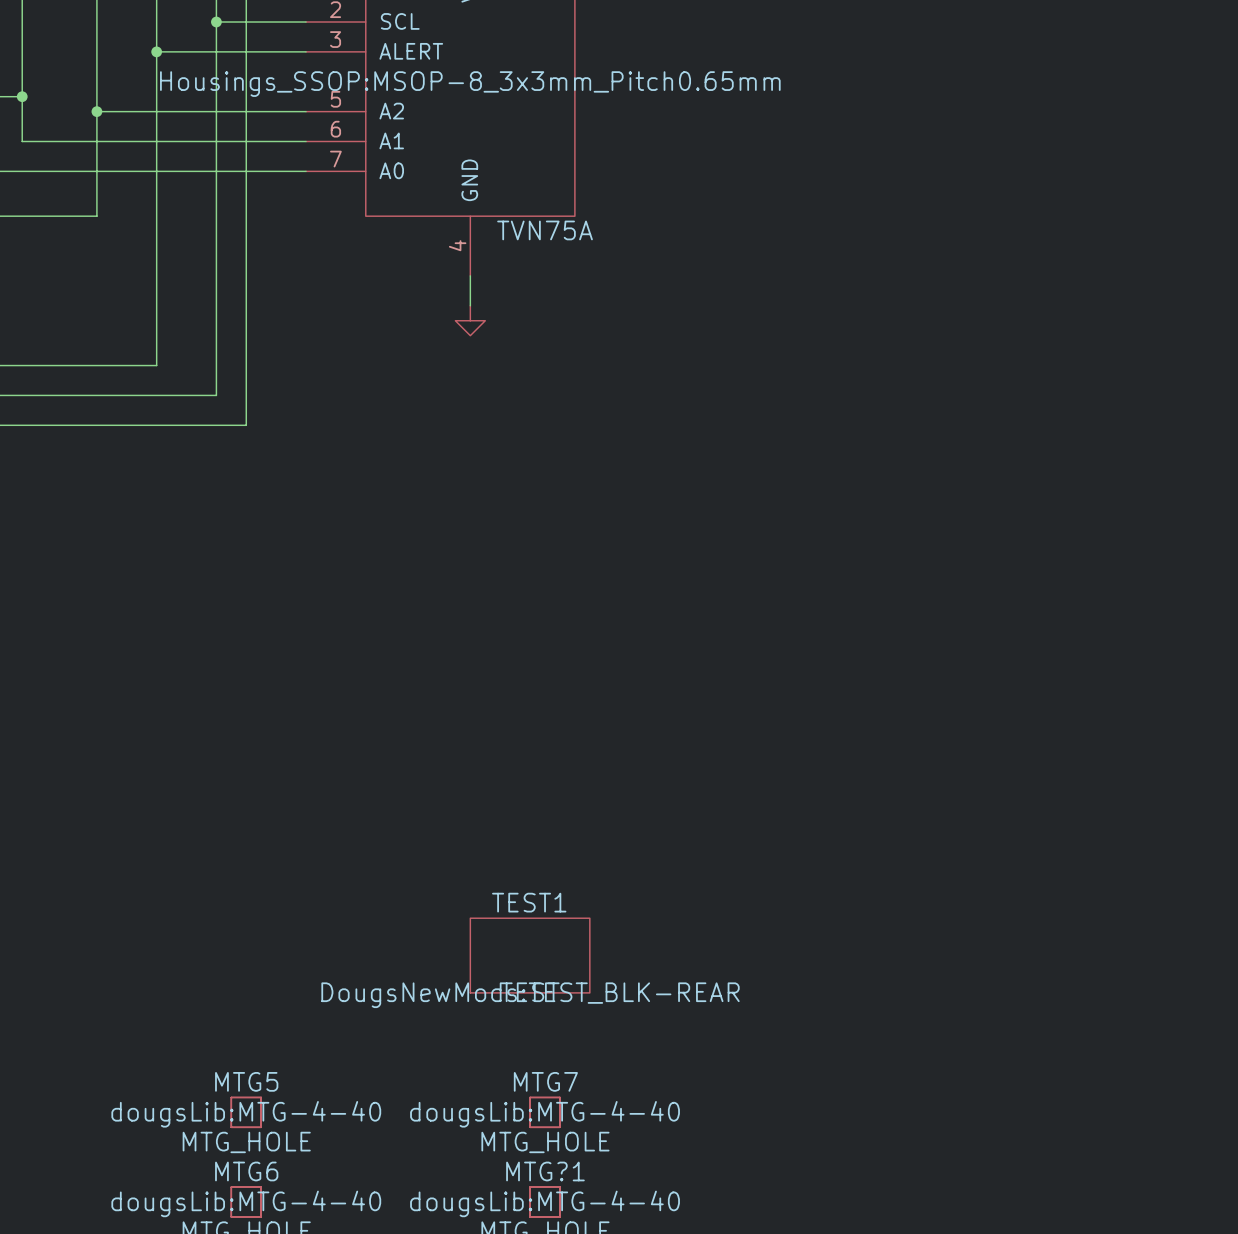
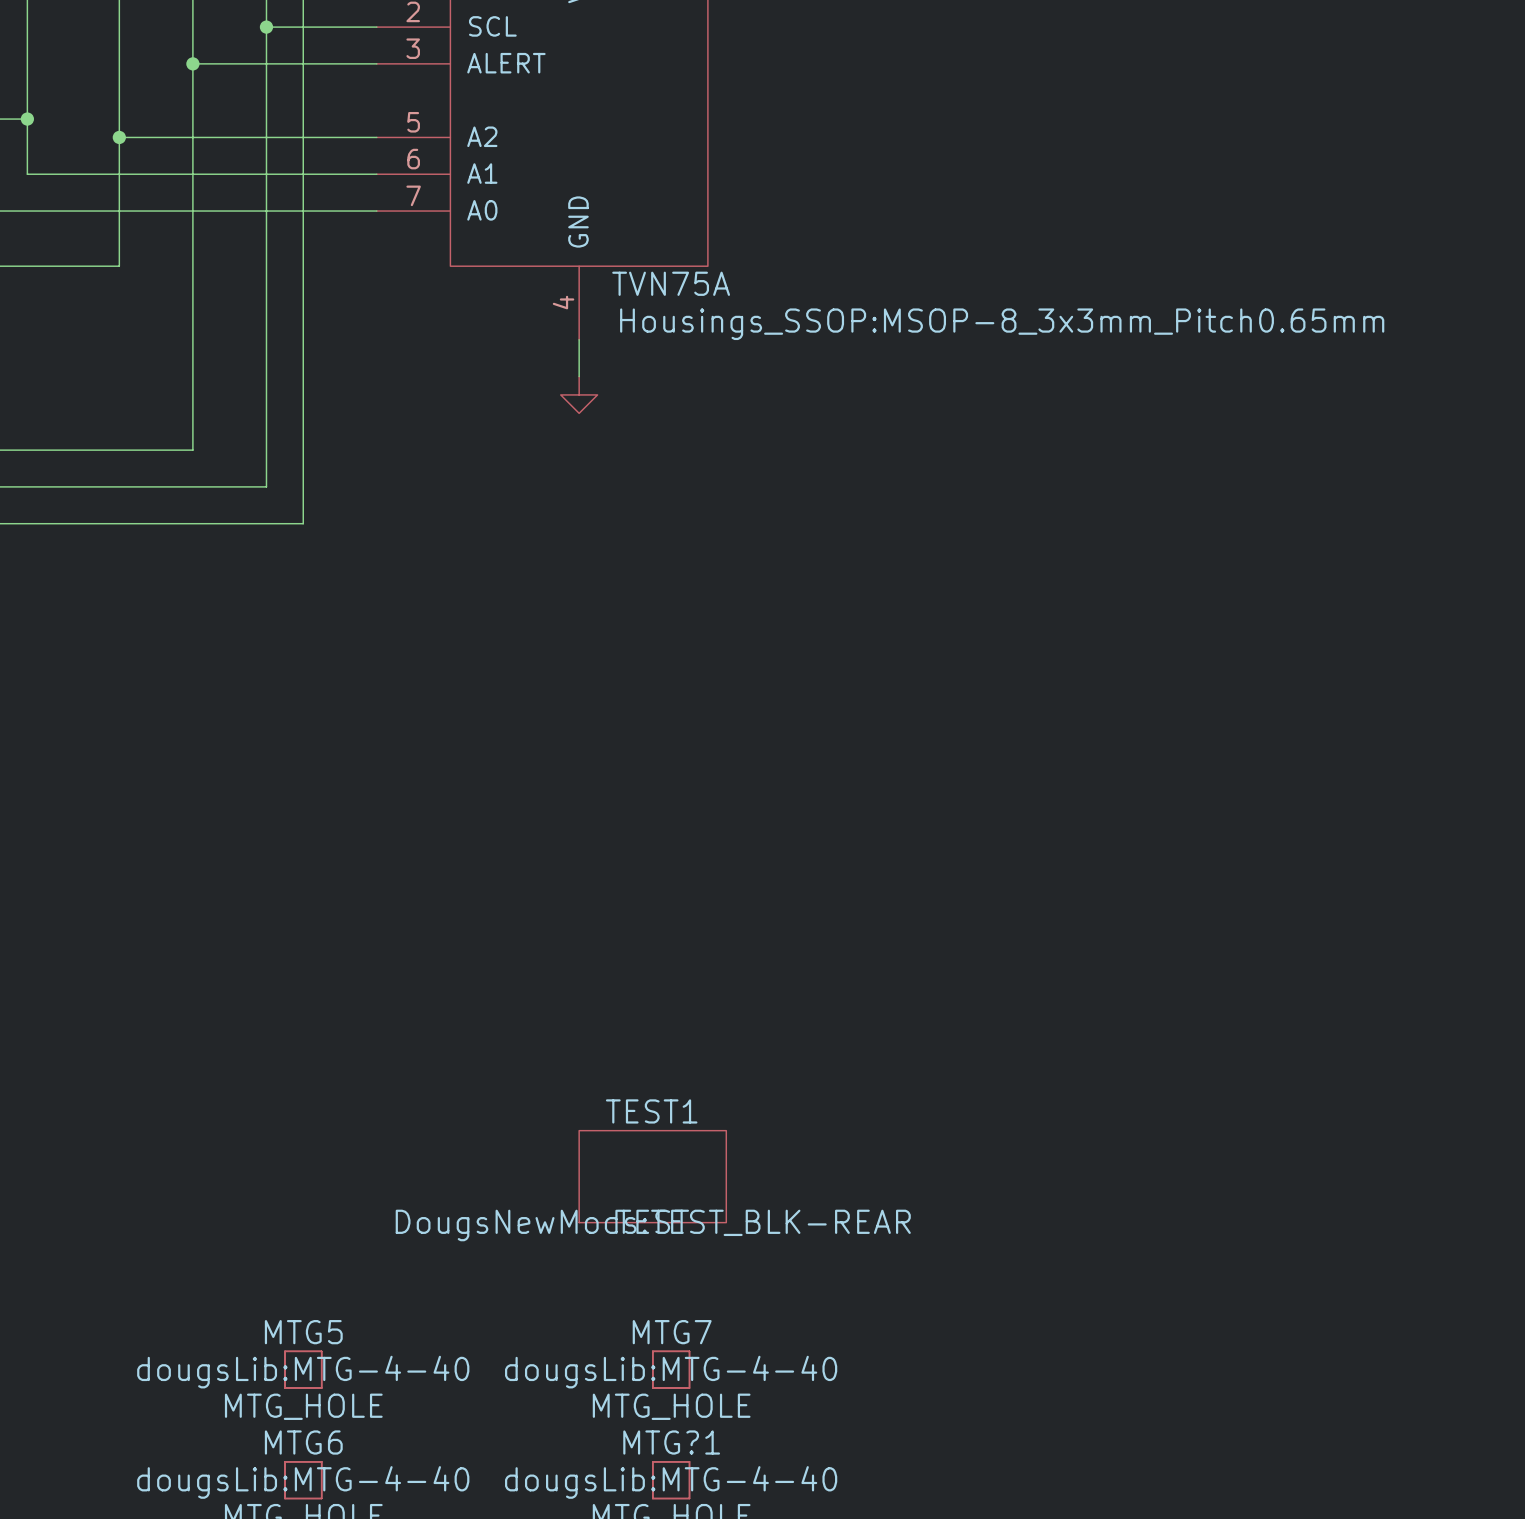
part text position: Housings_SSOP:MSOP-8_3x3mm_Pitch0.65mm (470, 84) -> Housings_SSOP:MSOP-8_3x3mm_Pitch0.65mm (1002, 324)

